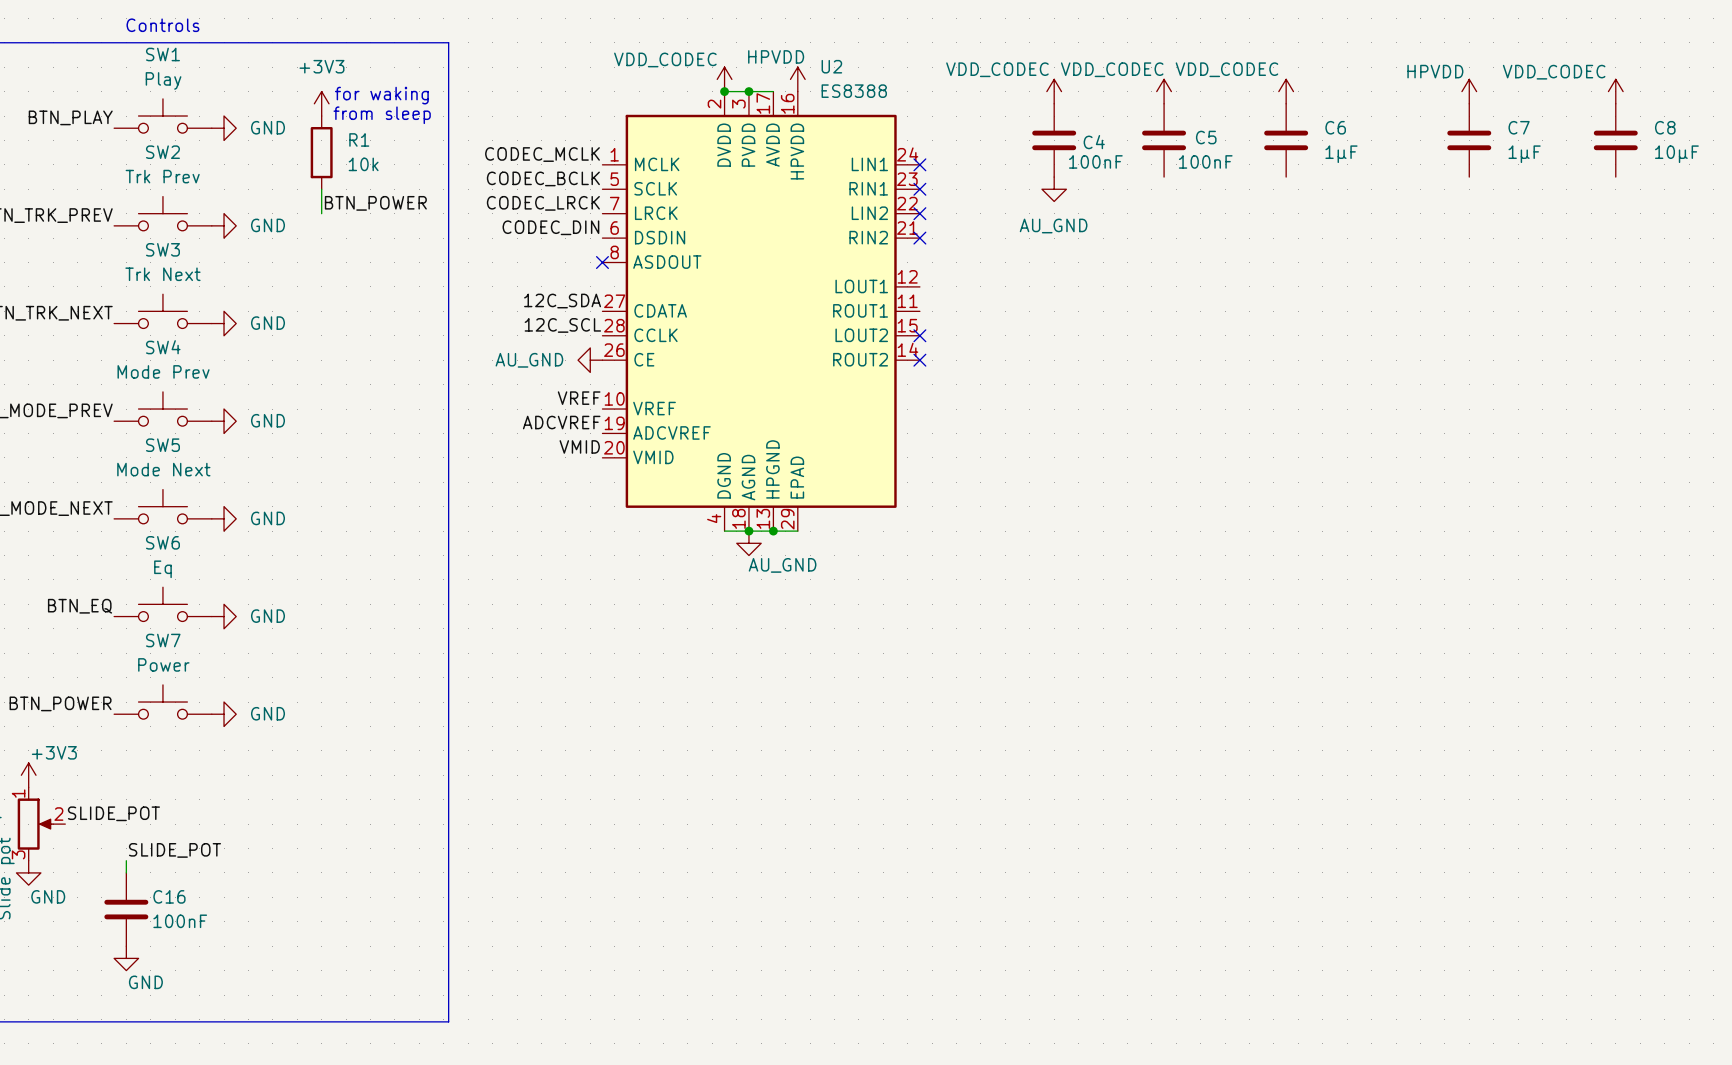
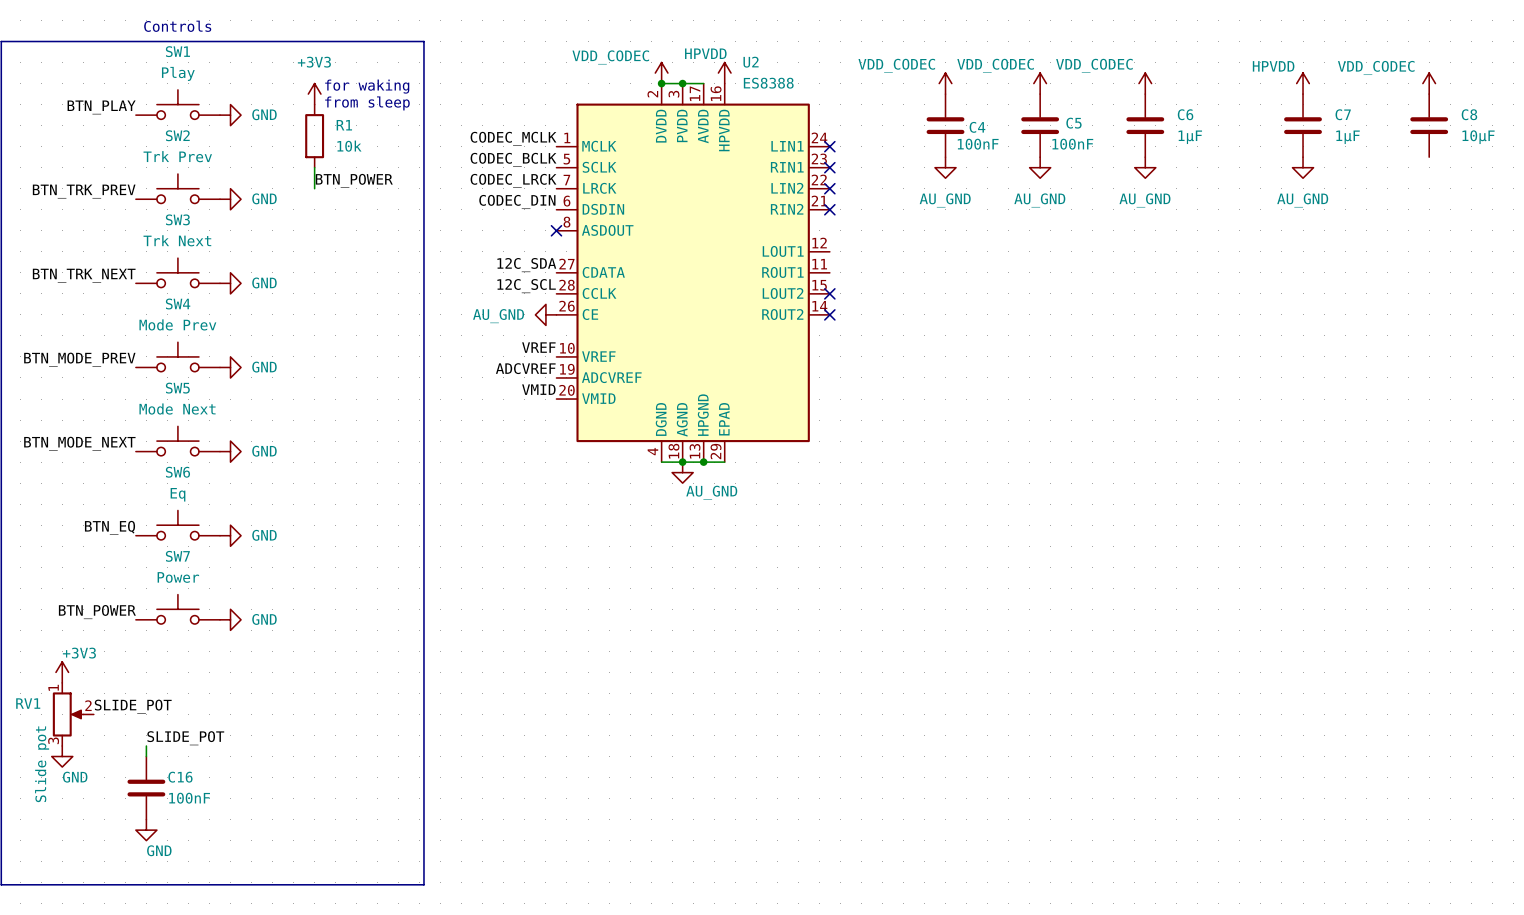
power symbol: none -> AU_GND (1040, 167)
power symbol: none -> AU_GND (1145, 167)
power symbol: none -> AU_GND (1303, 167)

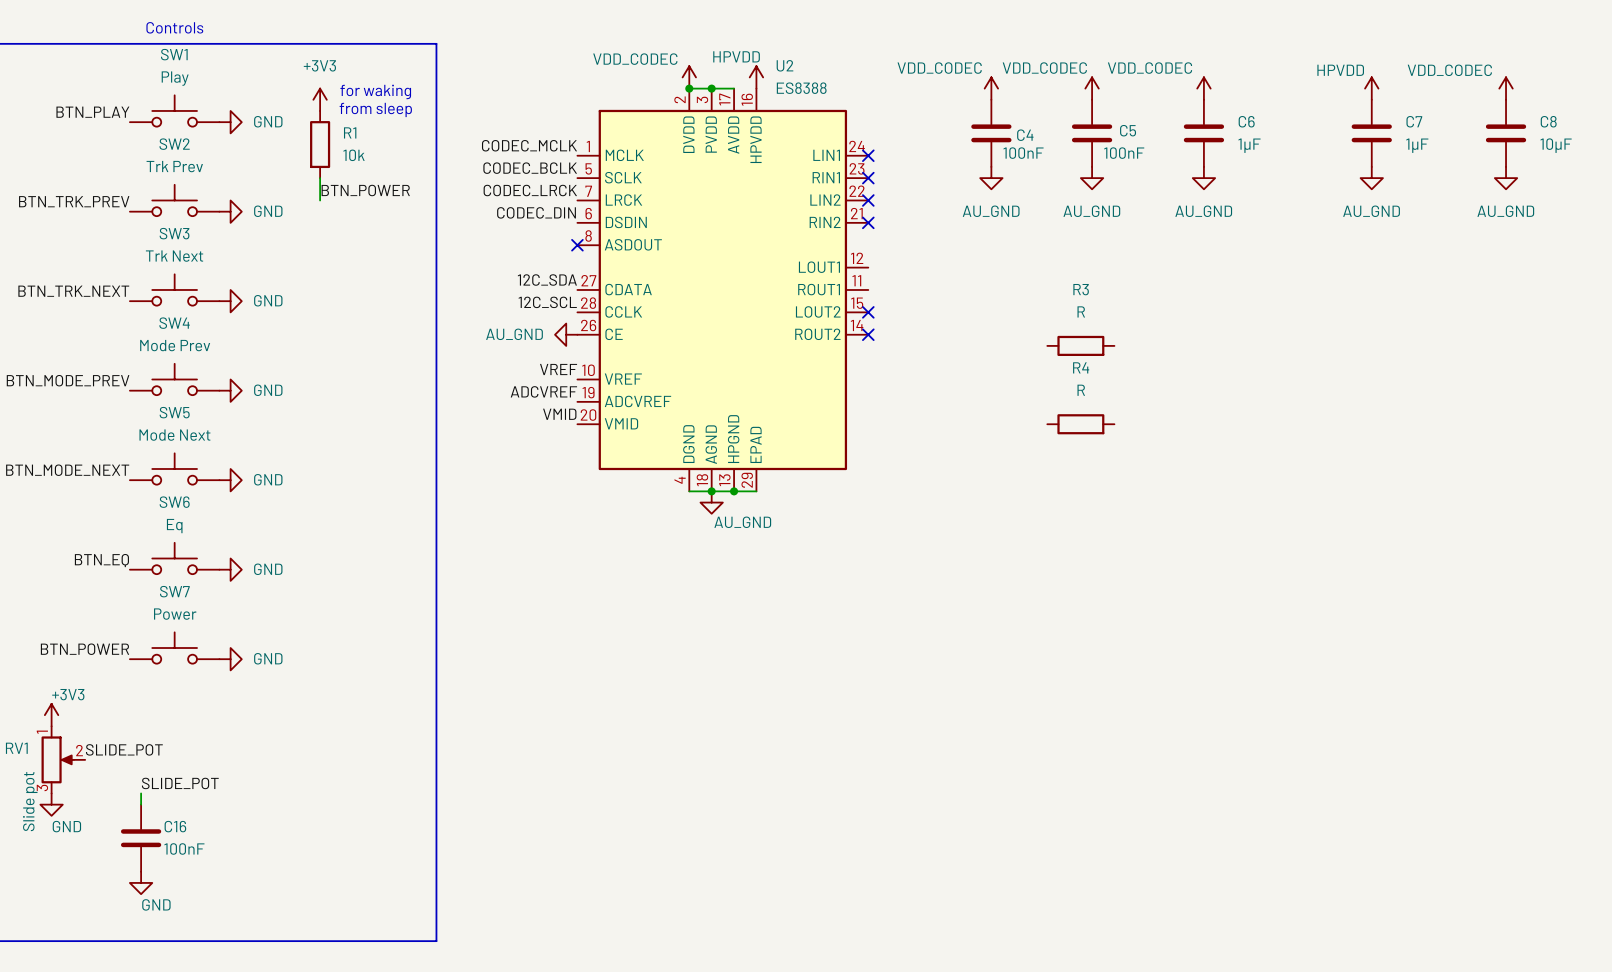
power symbol: none -> AU_GND (1506, 178)
R3: none -> R (1080, 345)
R4: none -> R (1080, 424)

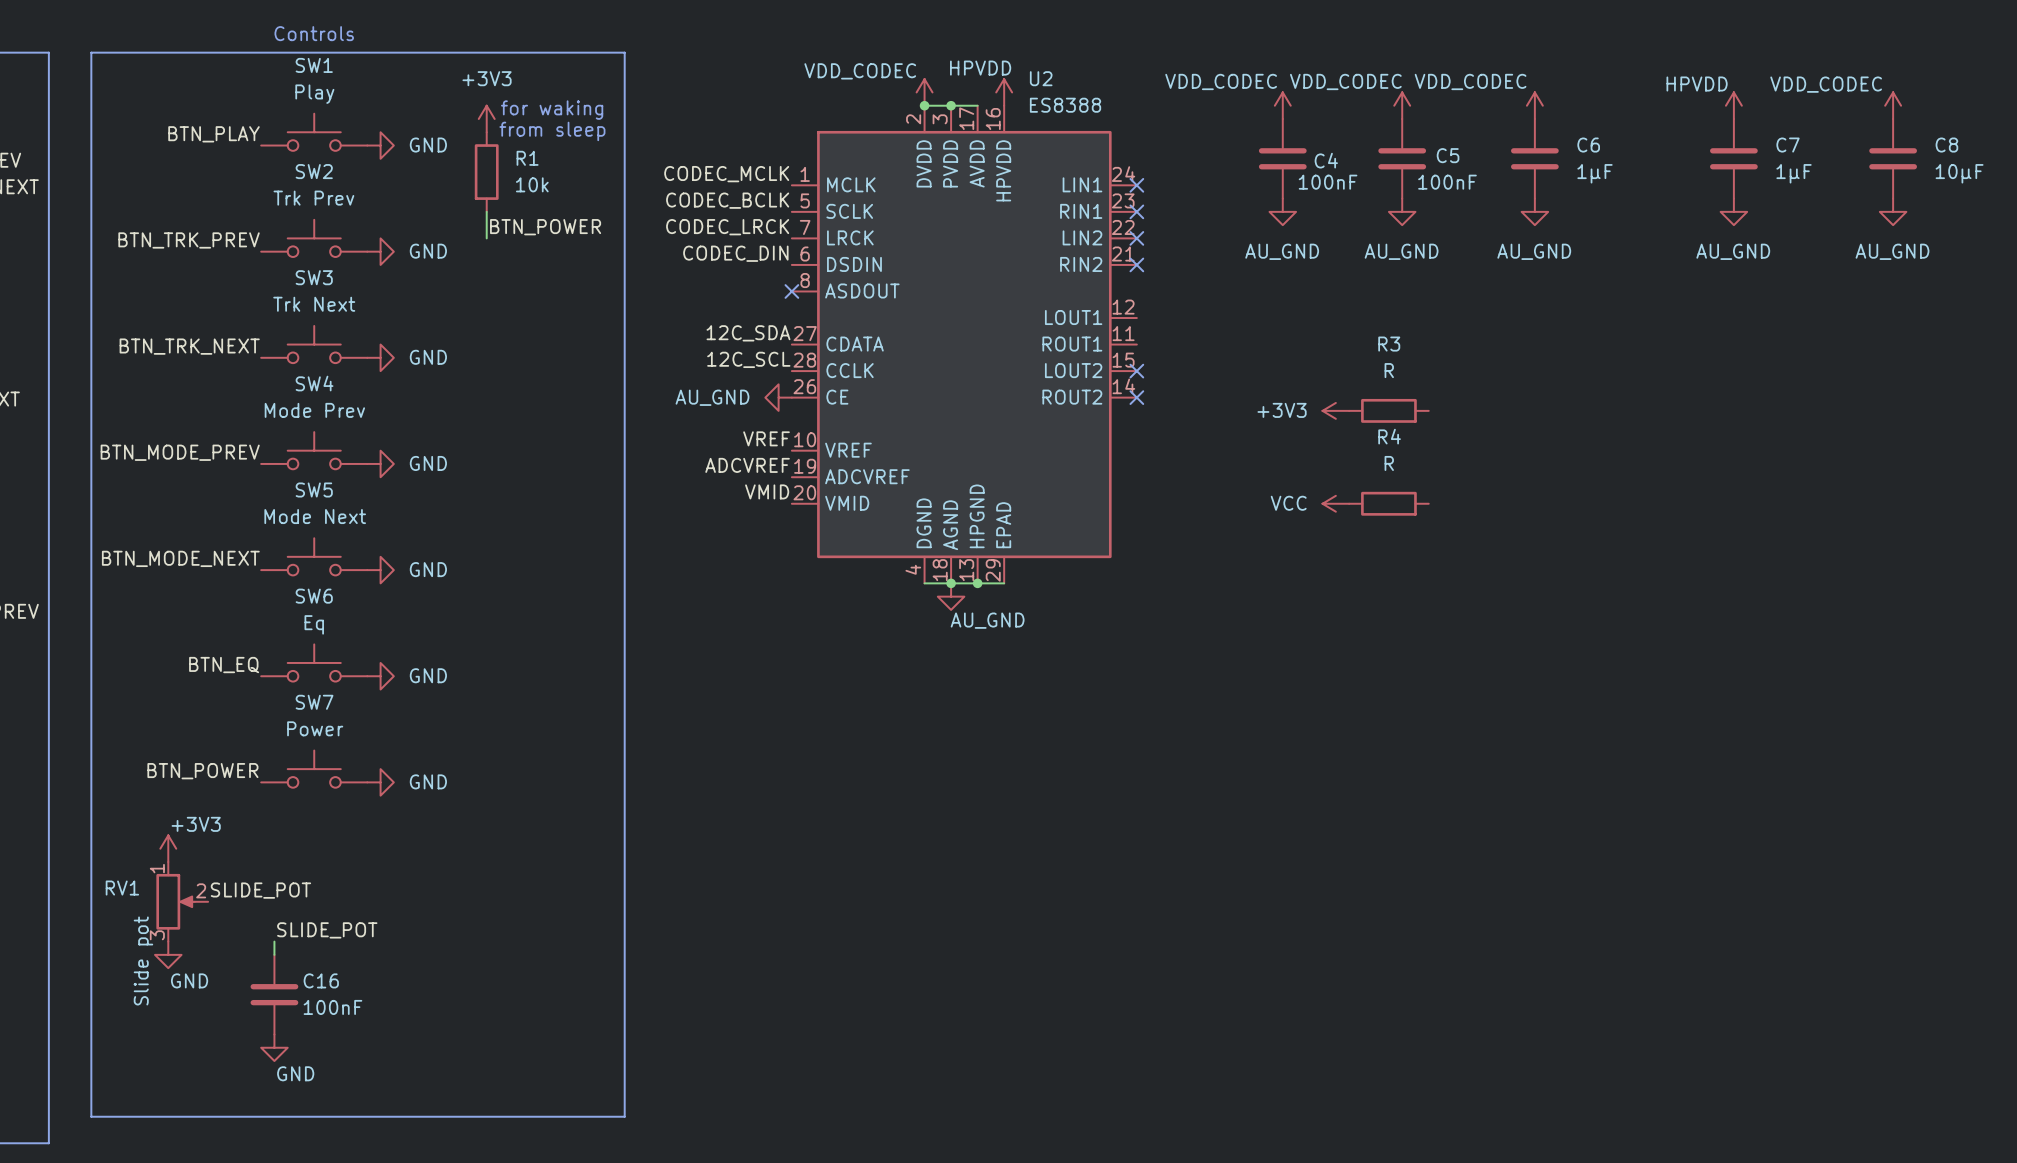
power symbol: none -> +3V3 (1335, 410)
power symbol: none -> VCC (1335, 503)

